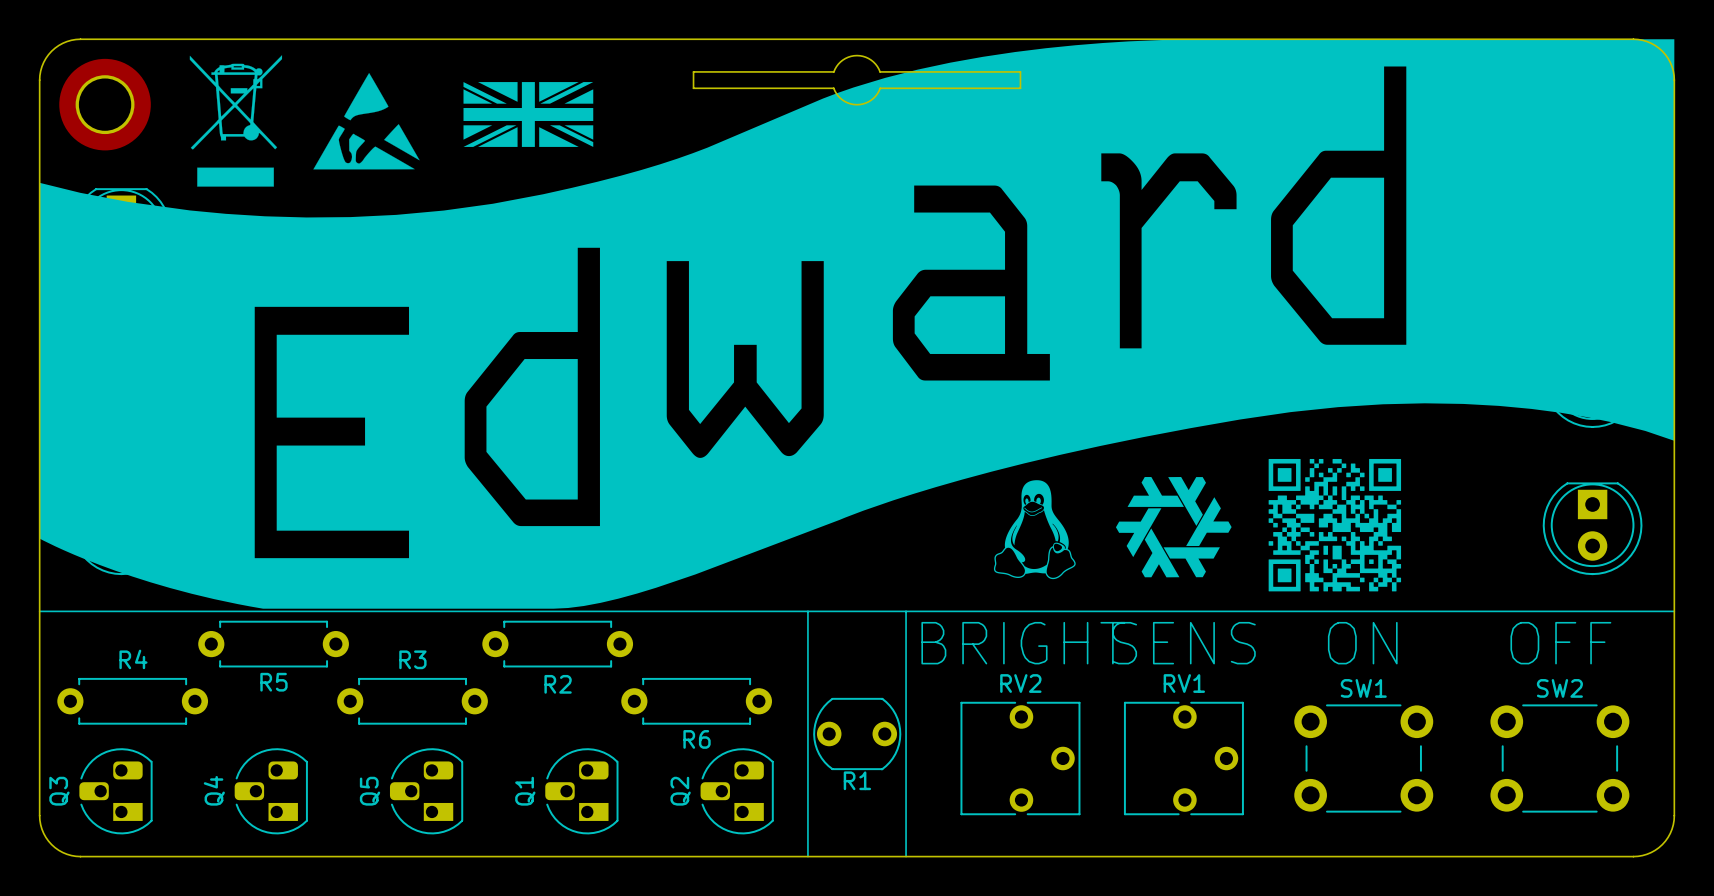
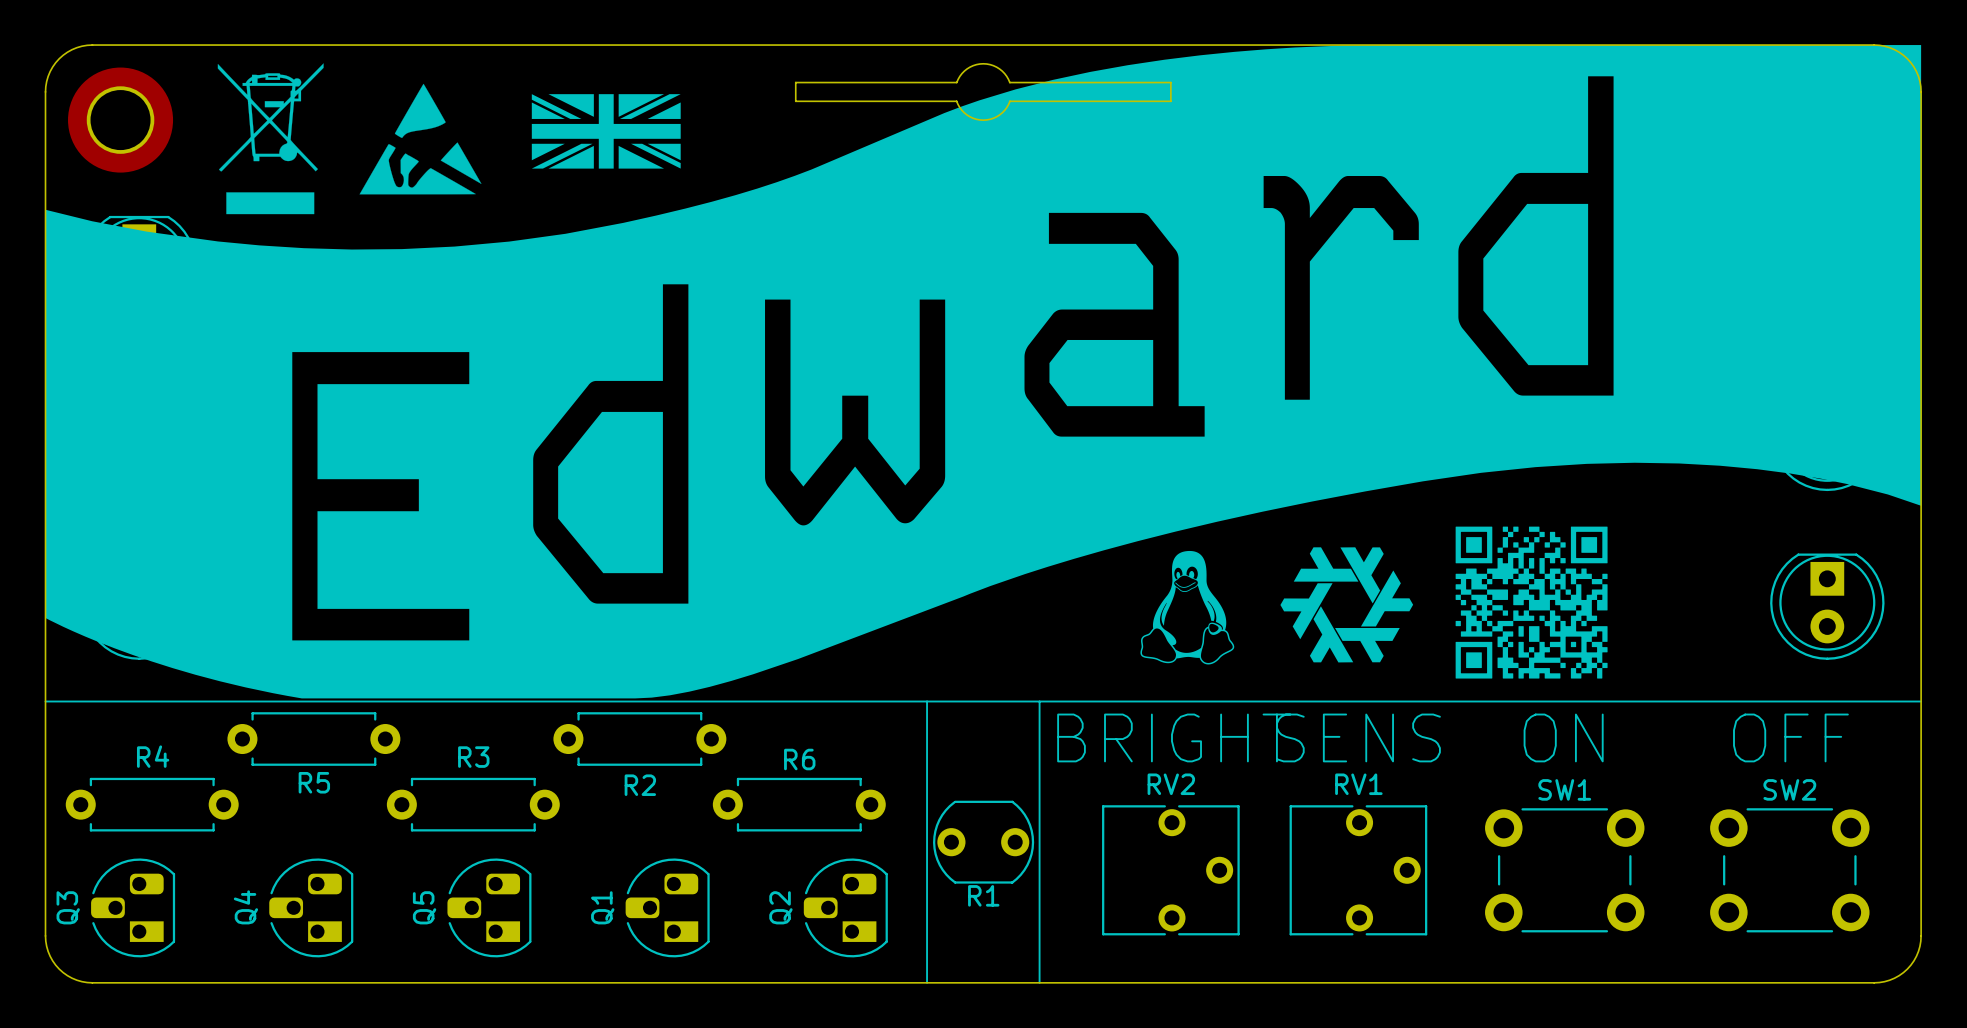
R6 name position: R6 (697, 739) -> R6 (799, 759)

